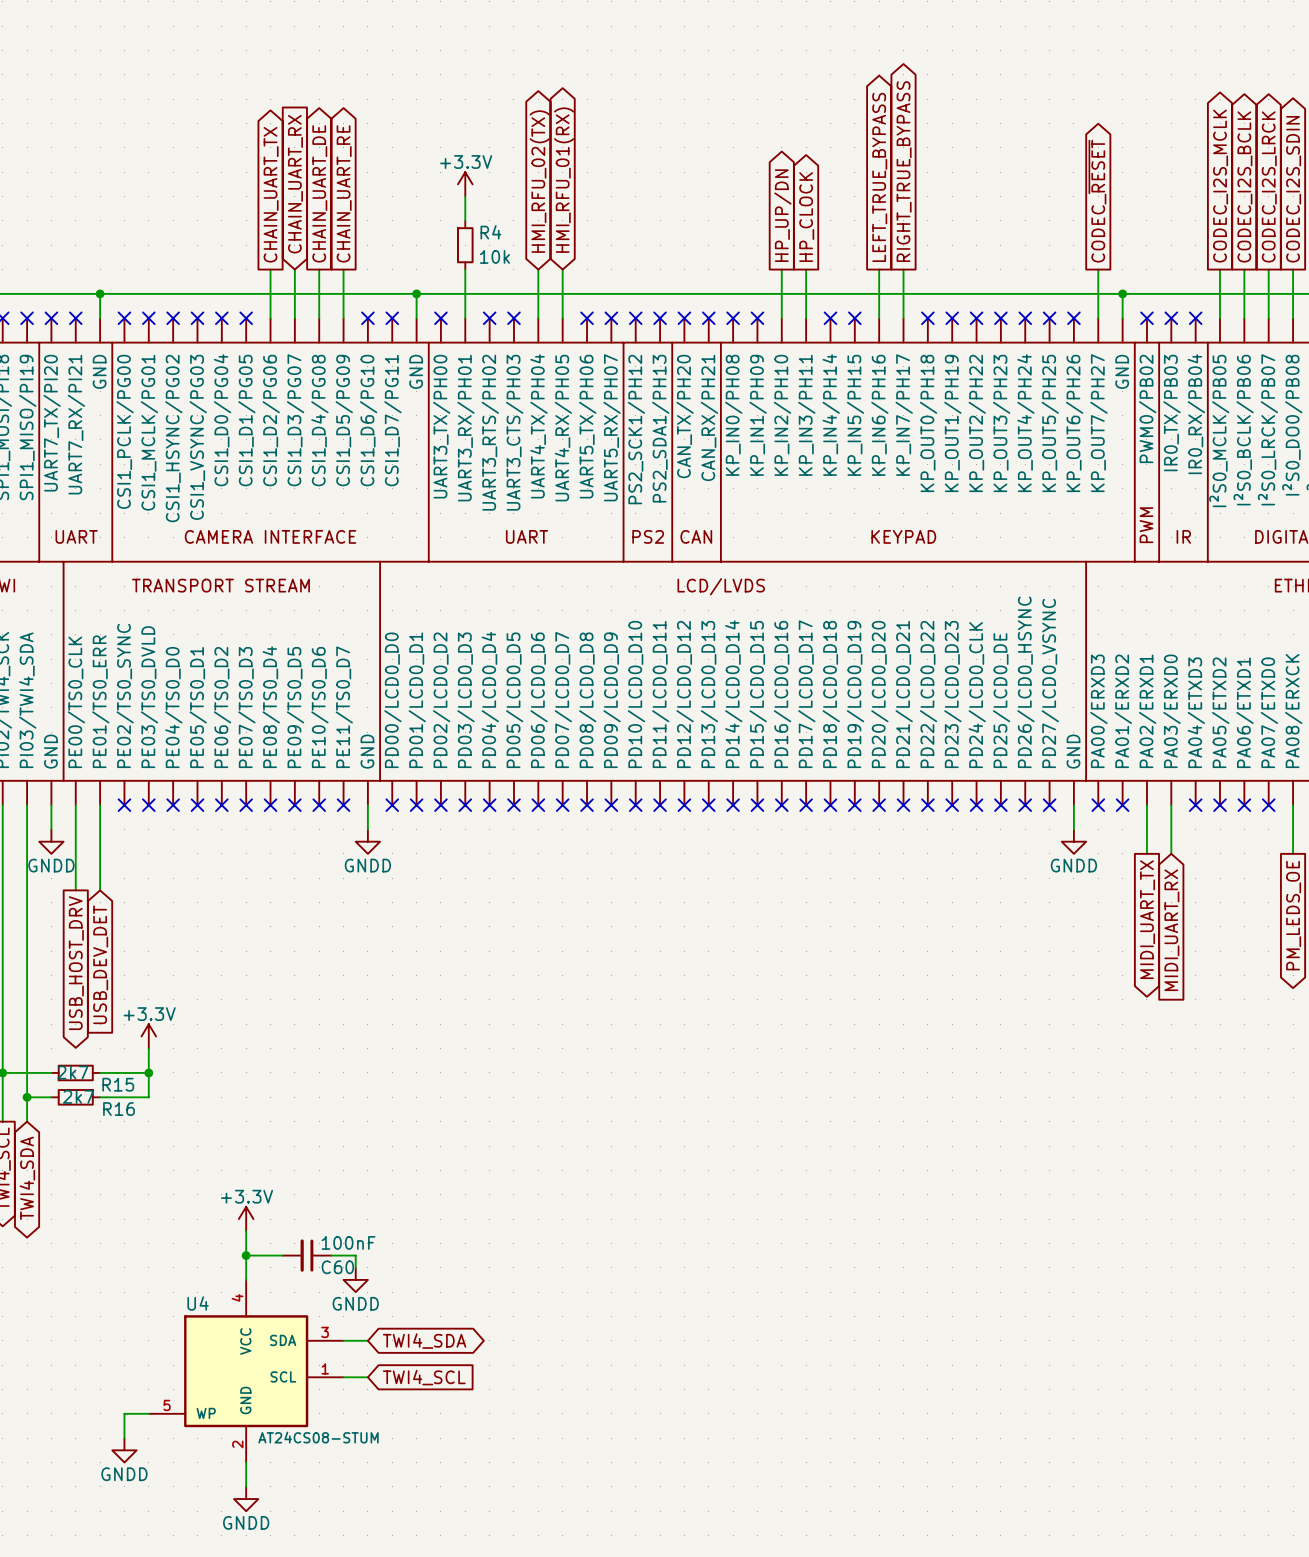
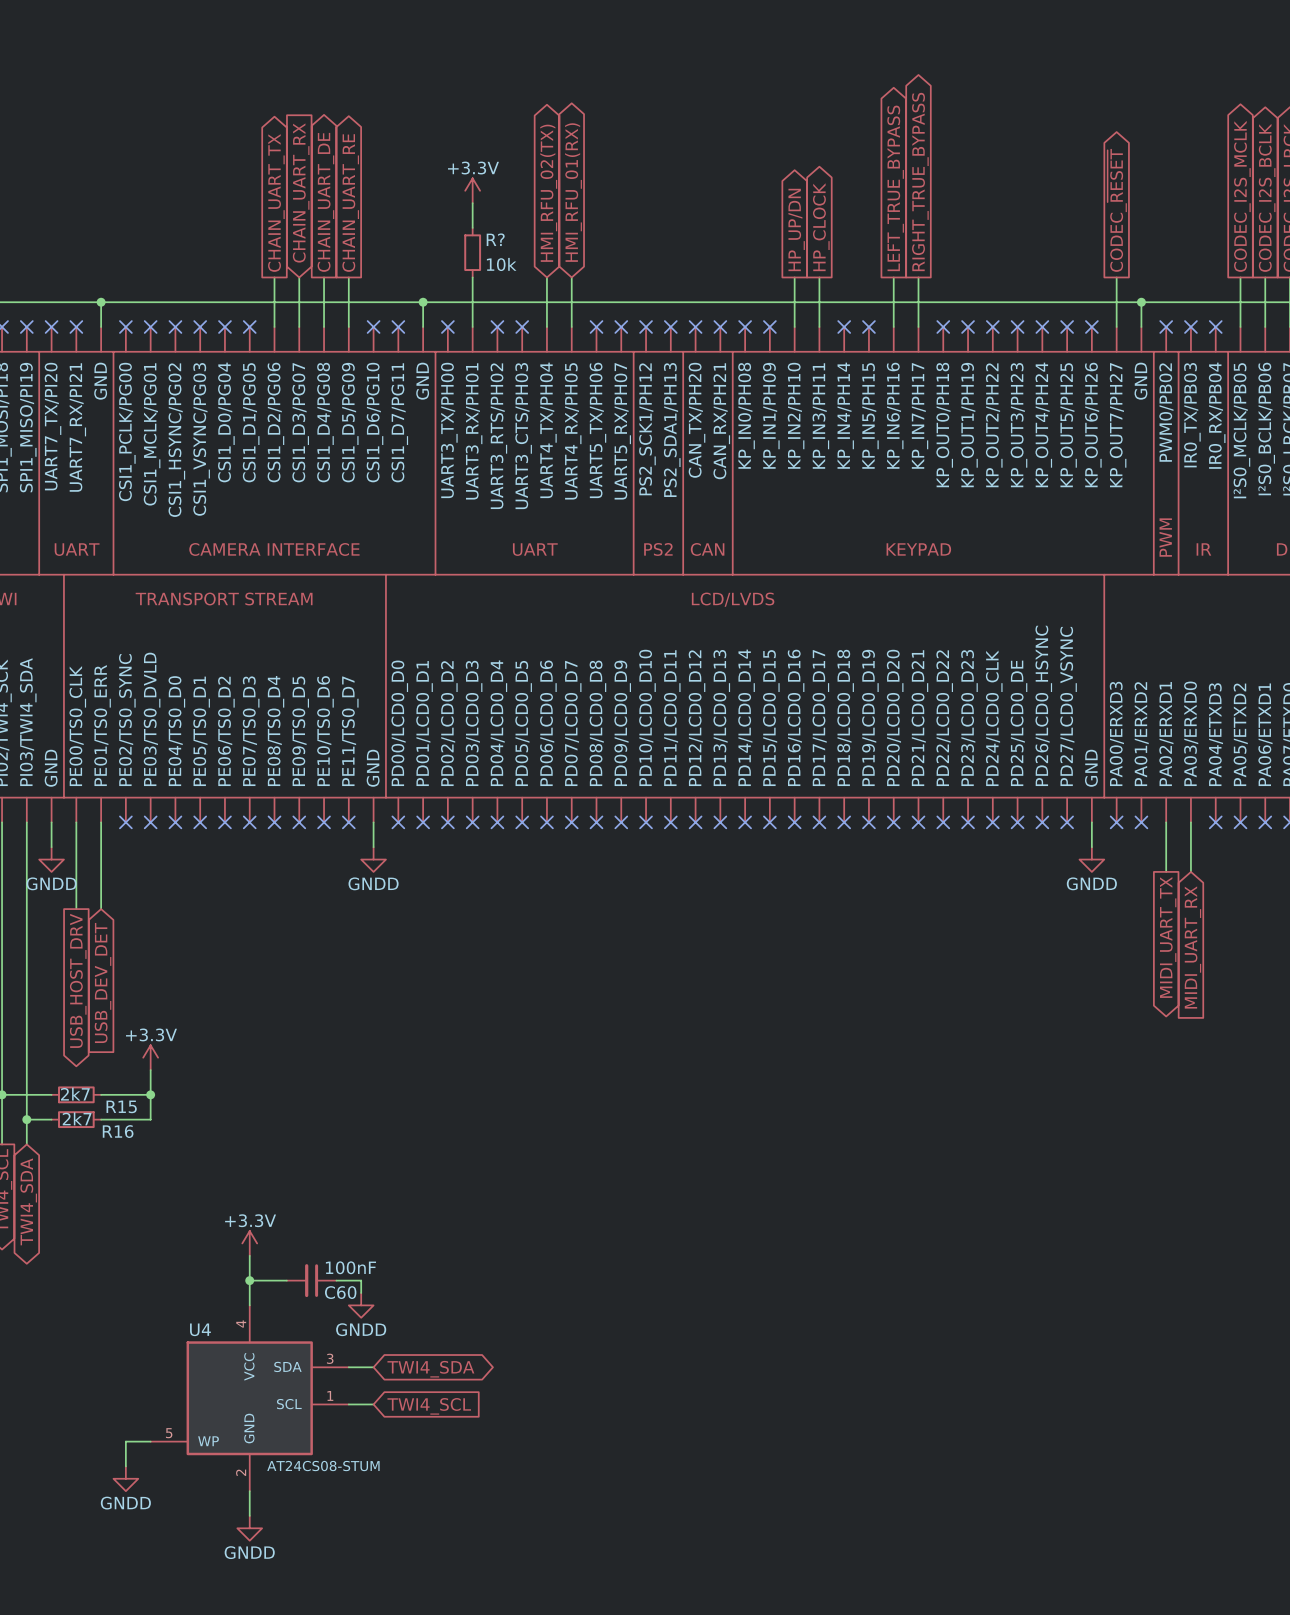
R4 name: R4 (490, 232) -> R? (495, 239)

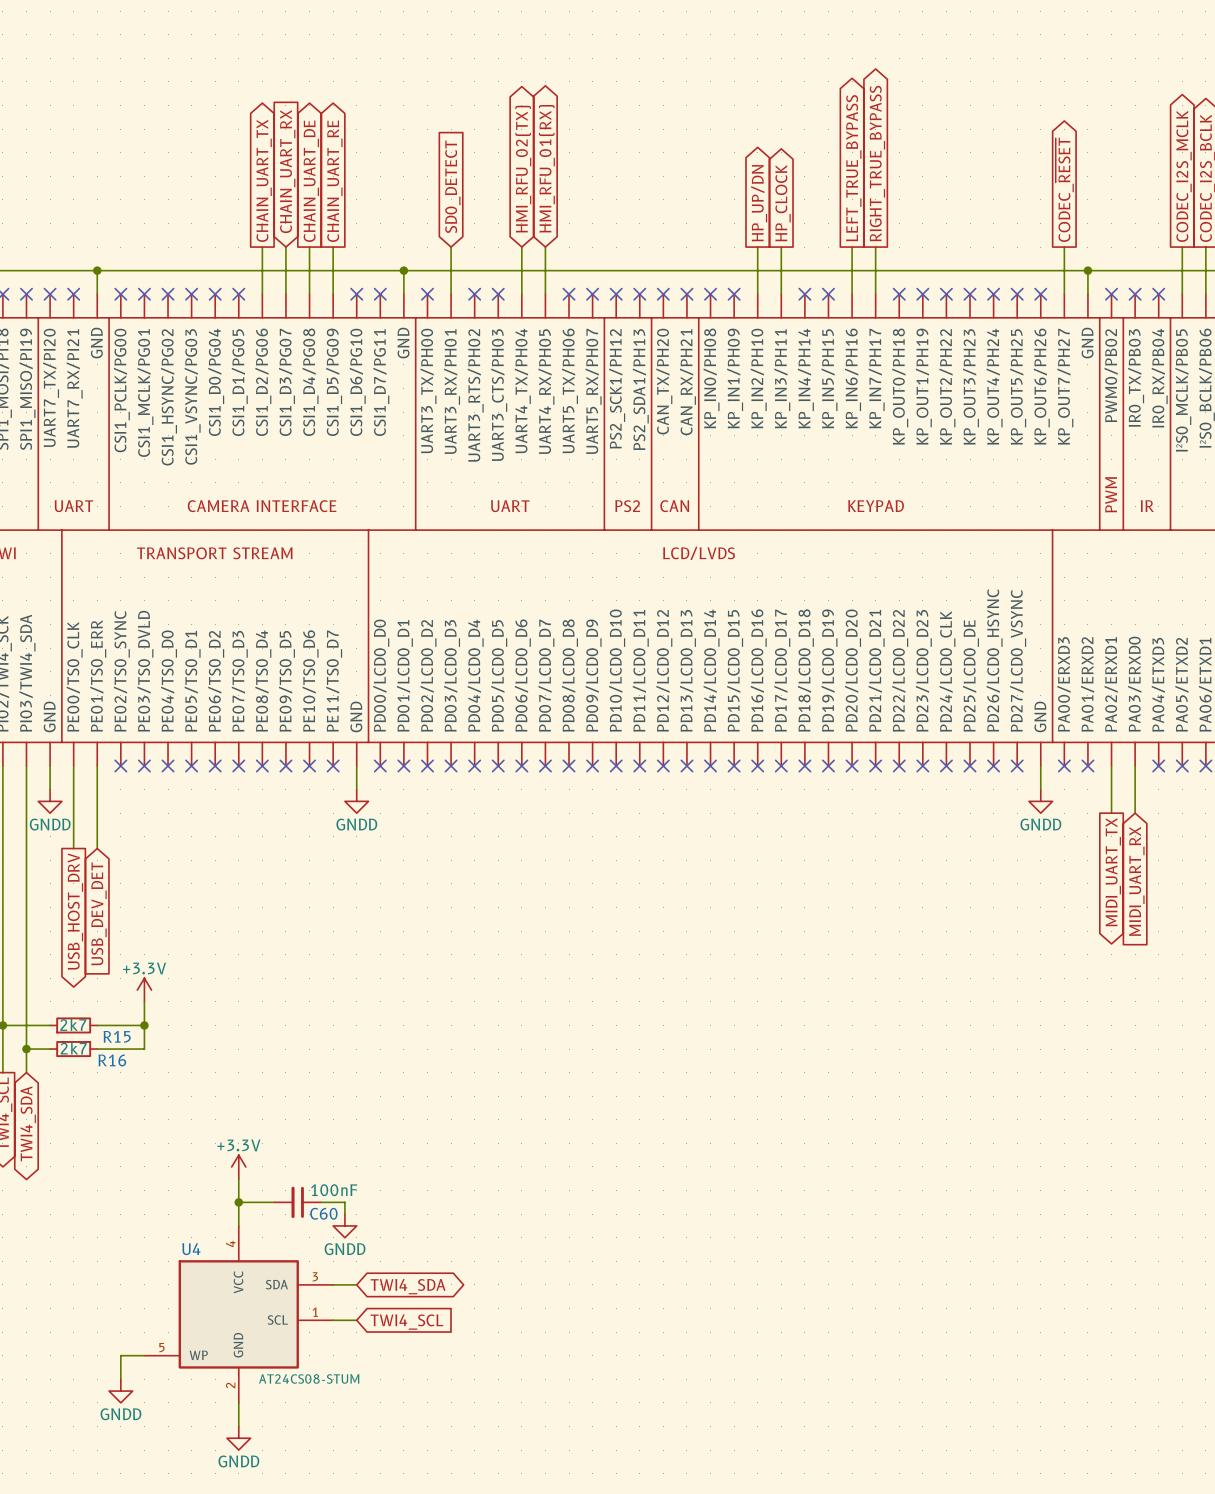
power symbol: +3.3V (472, 190) -> none
wire: (472, 203) (472, 227) -> none
global label: none -> SD0_DETECT (452, 186)
R?: 10k (472, 252) -> none

